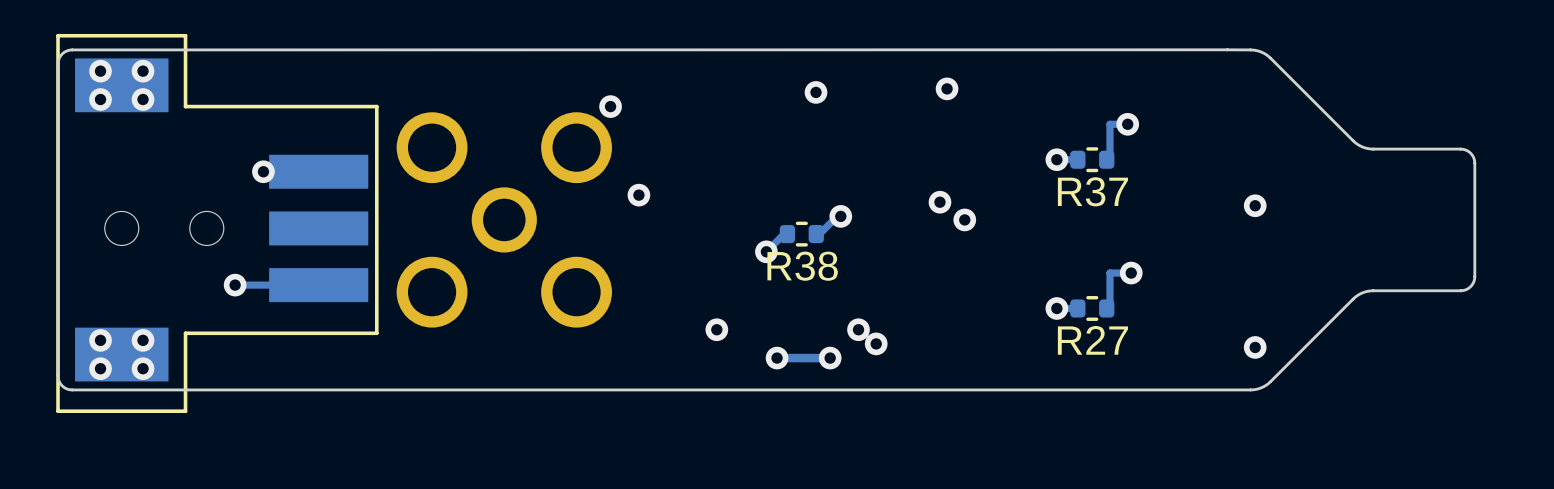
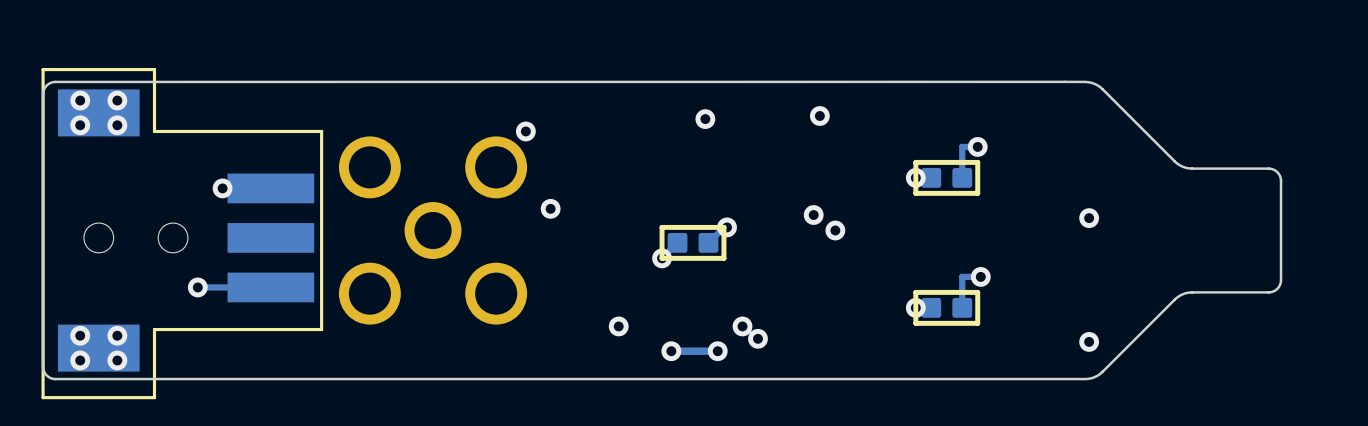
R37: (1092, 159) -> none
part: none -> (946, 177)
R38: (801, 234) -> none
part: none -> (693, 242)
R27: (1092, 308) -> none
part: none -> (946, 307)

